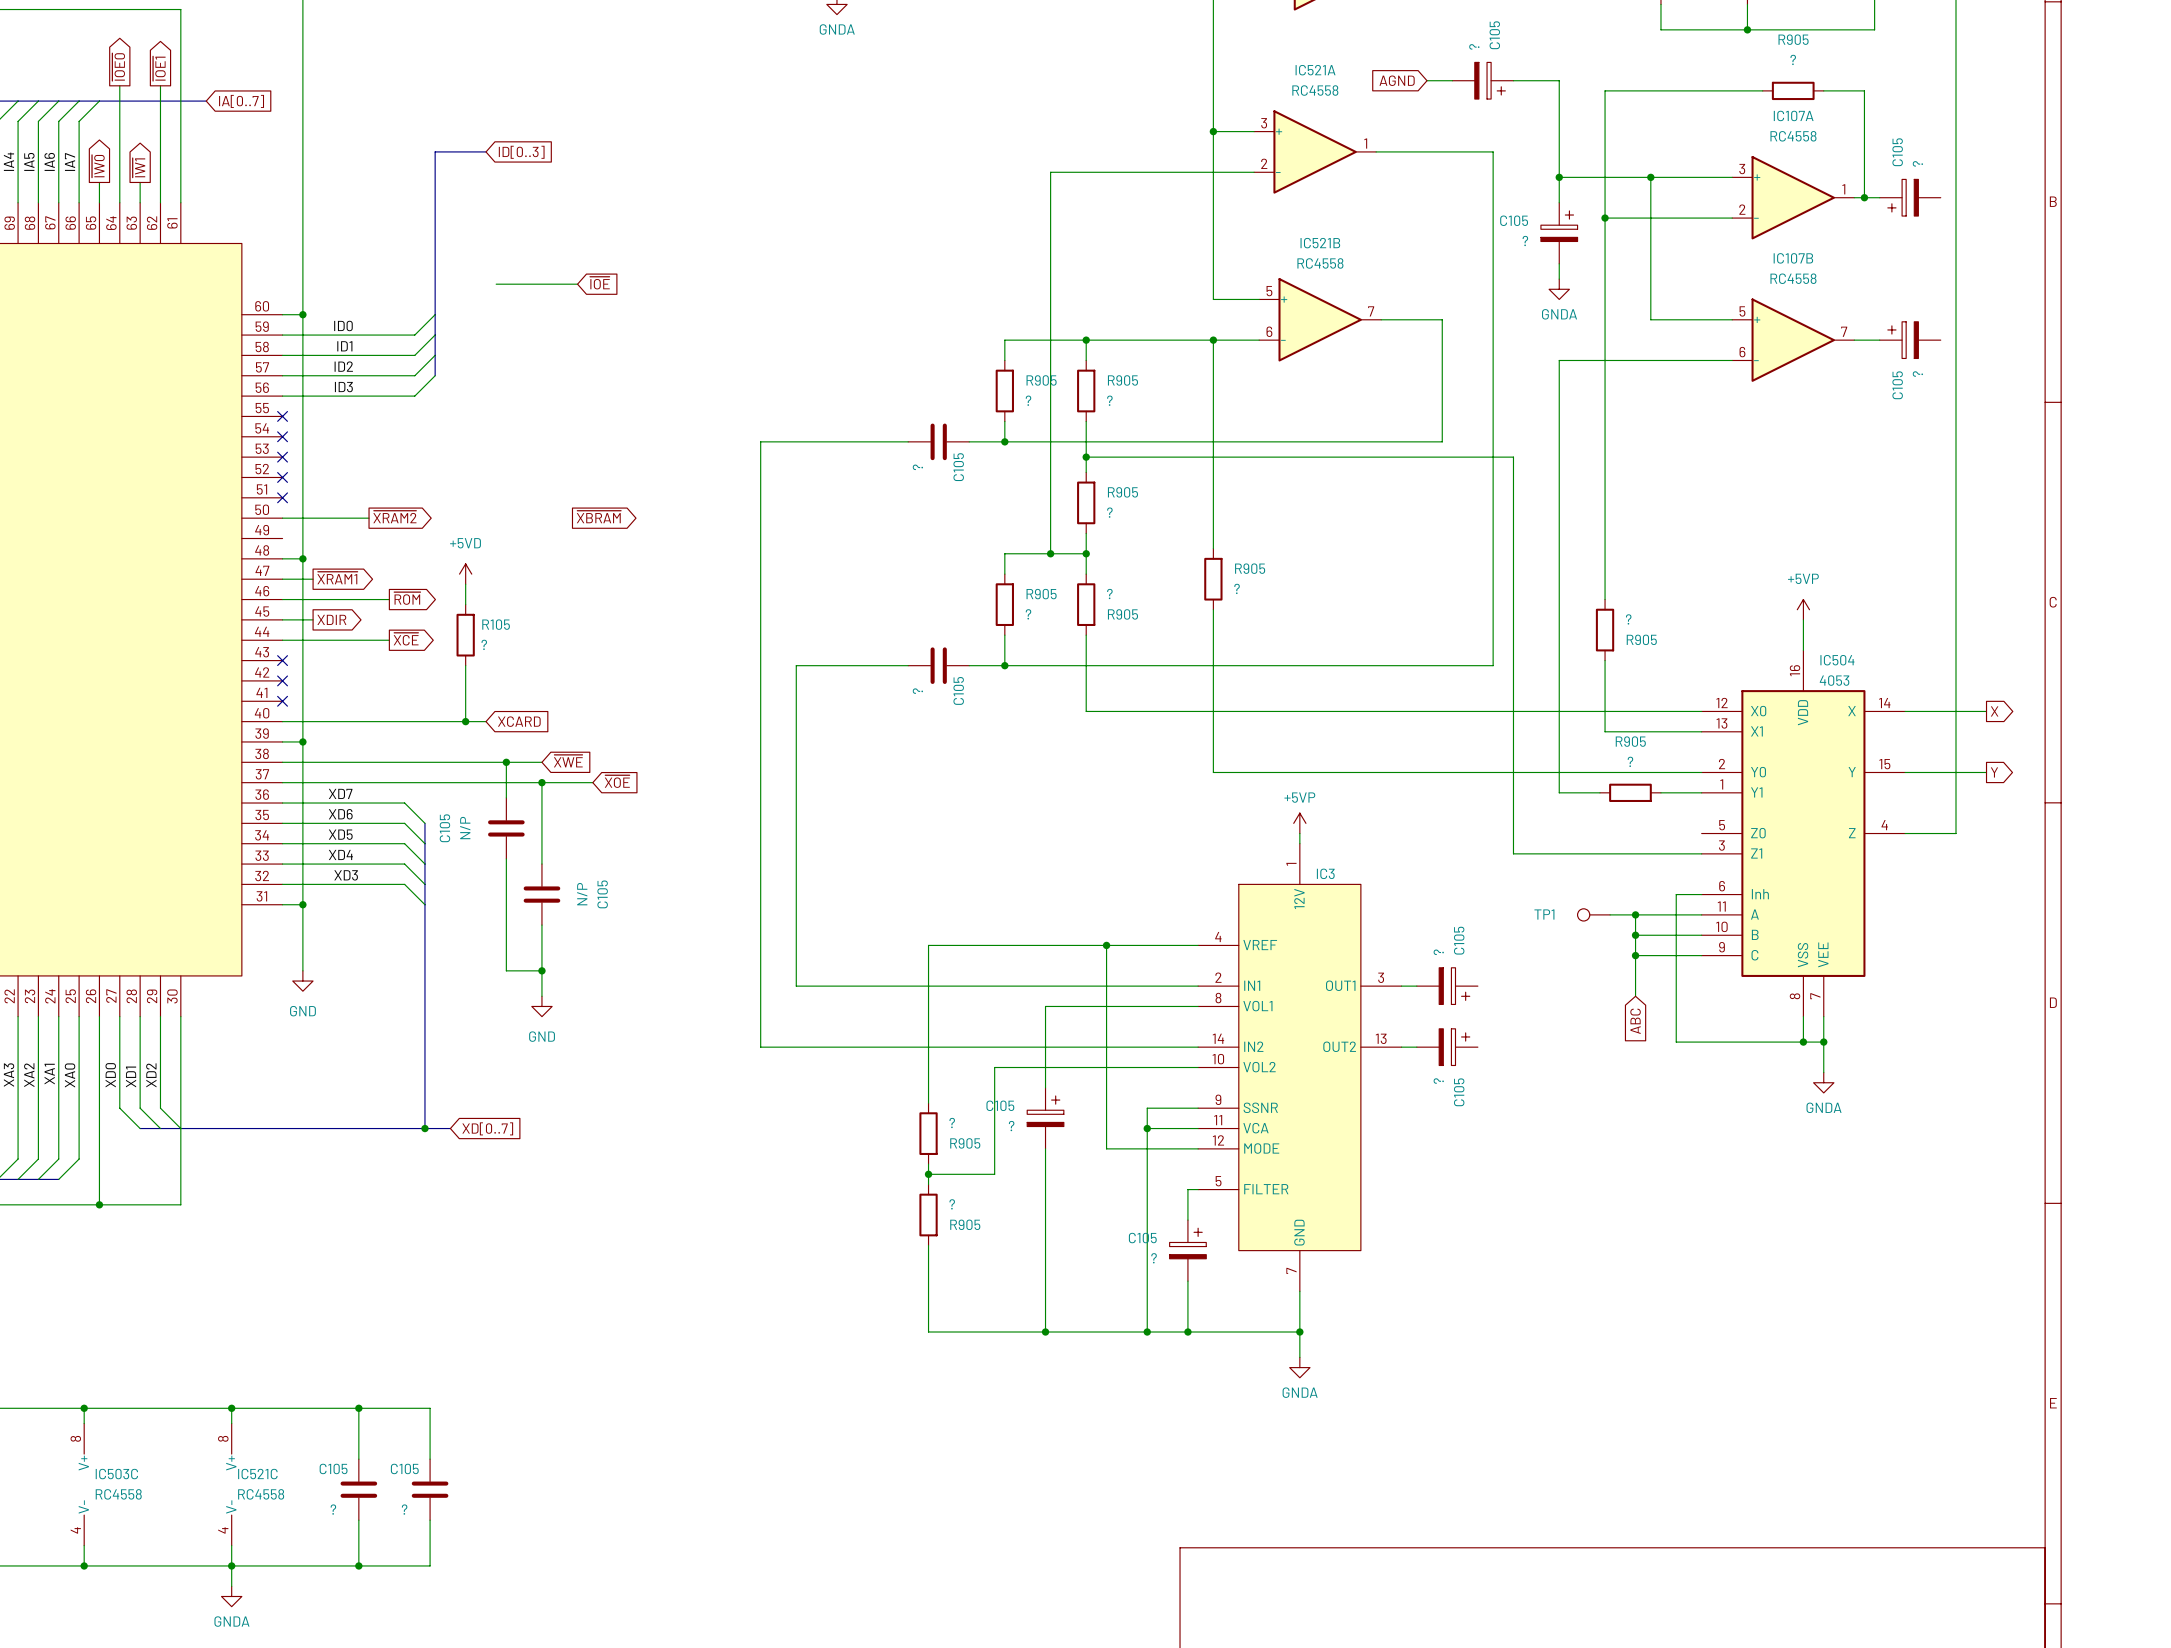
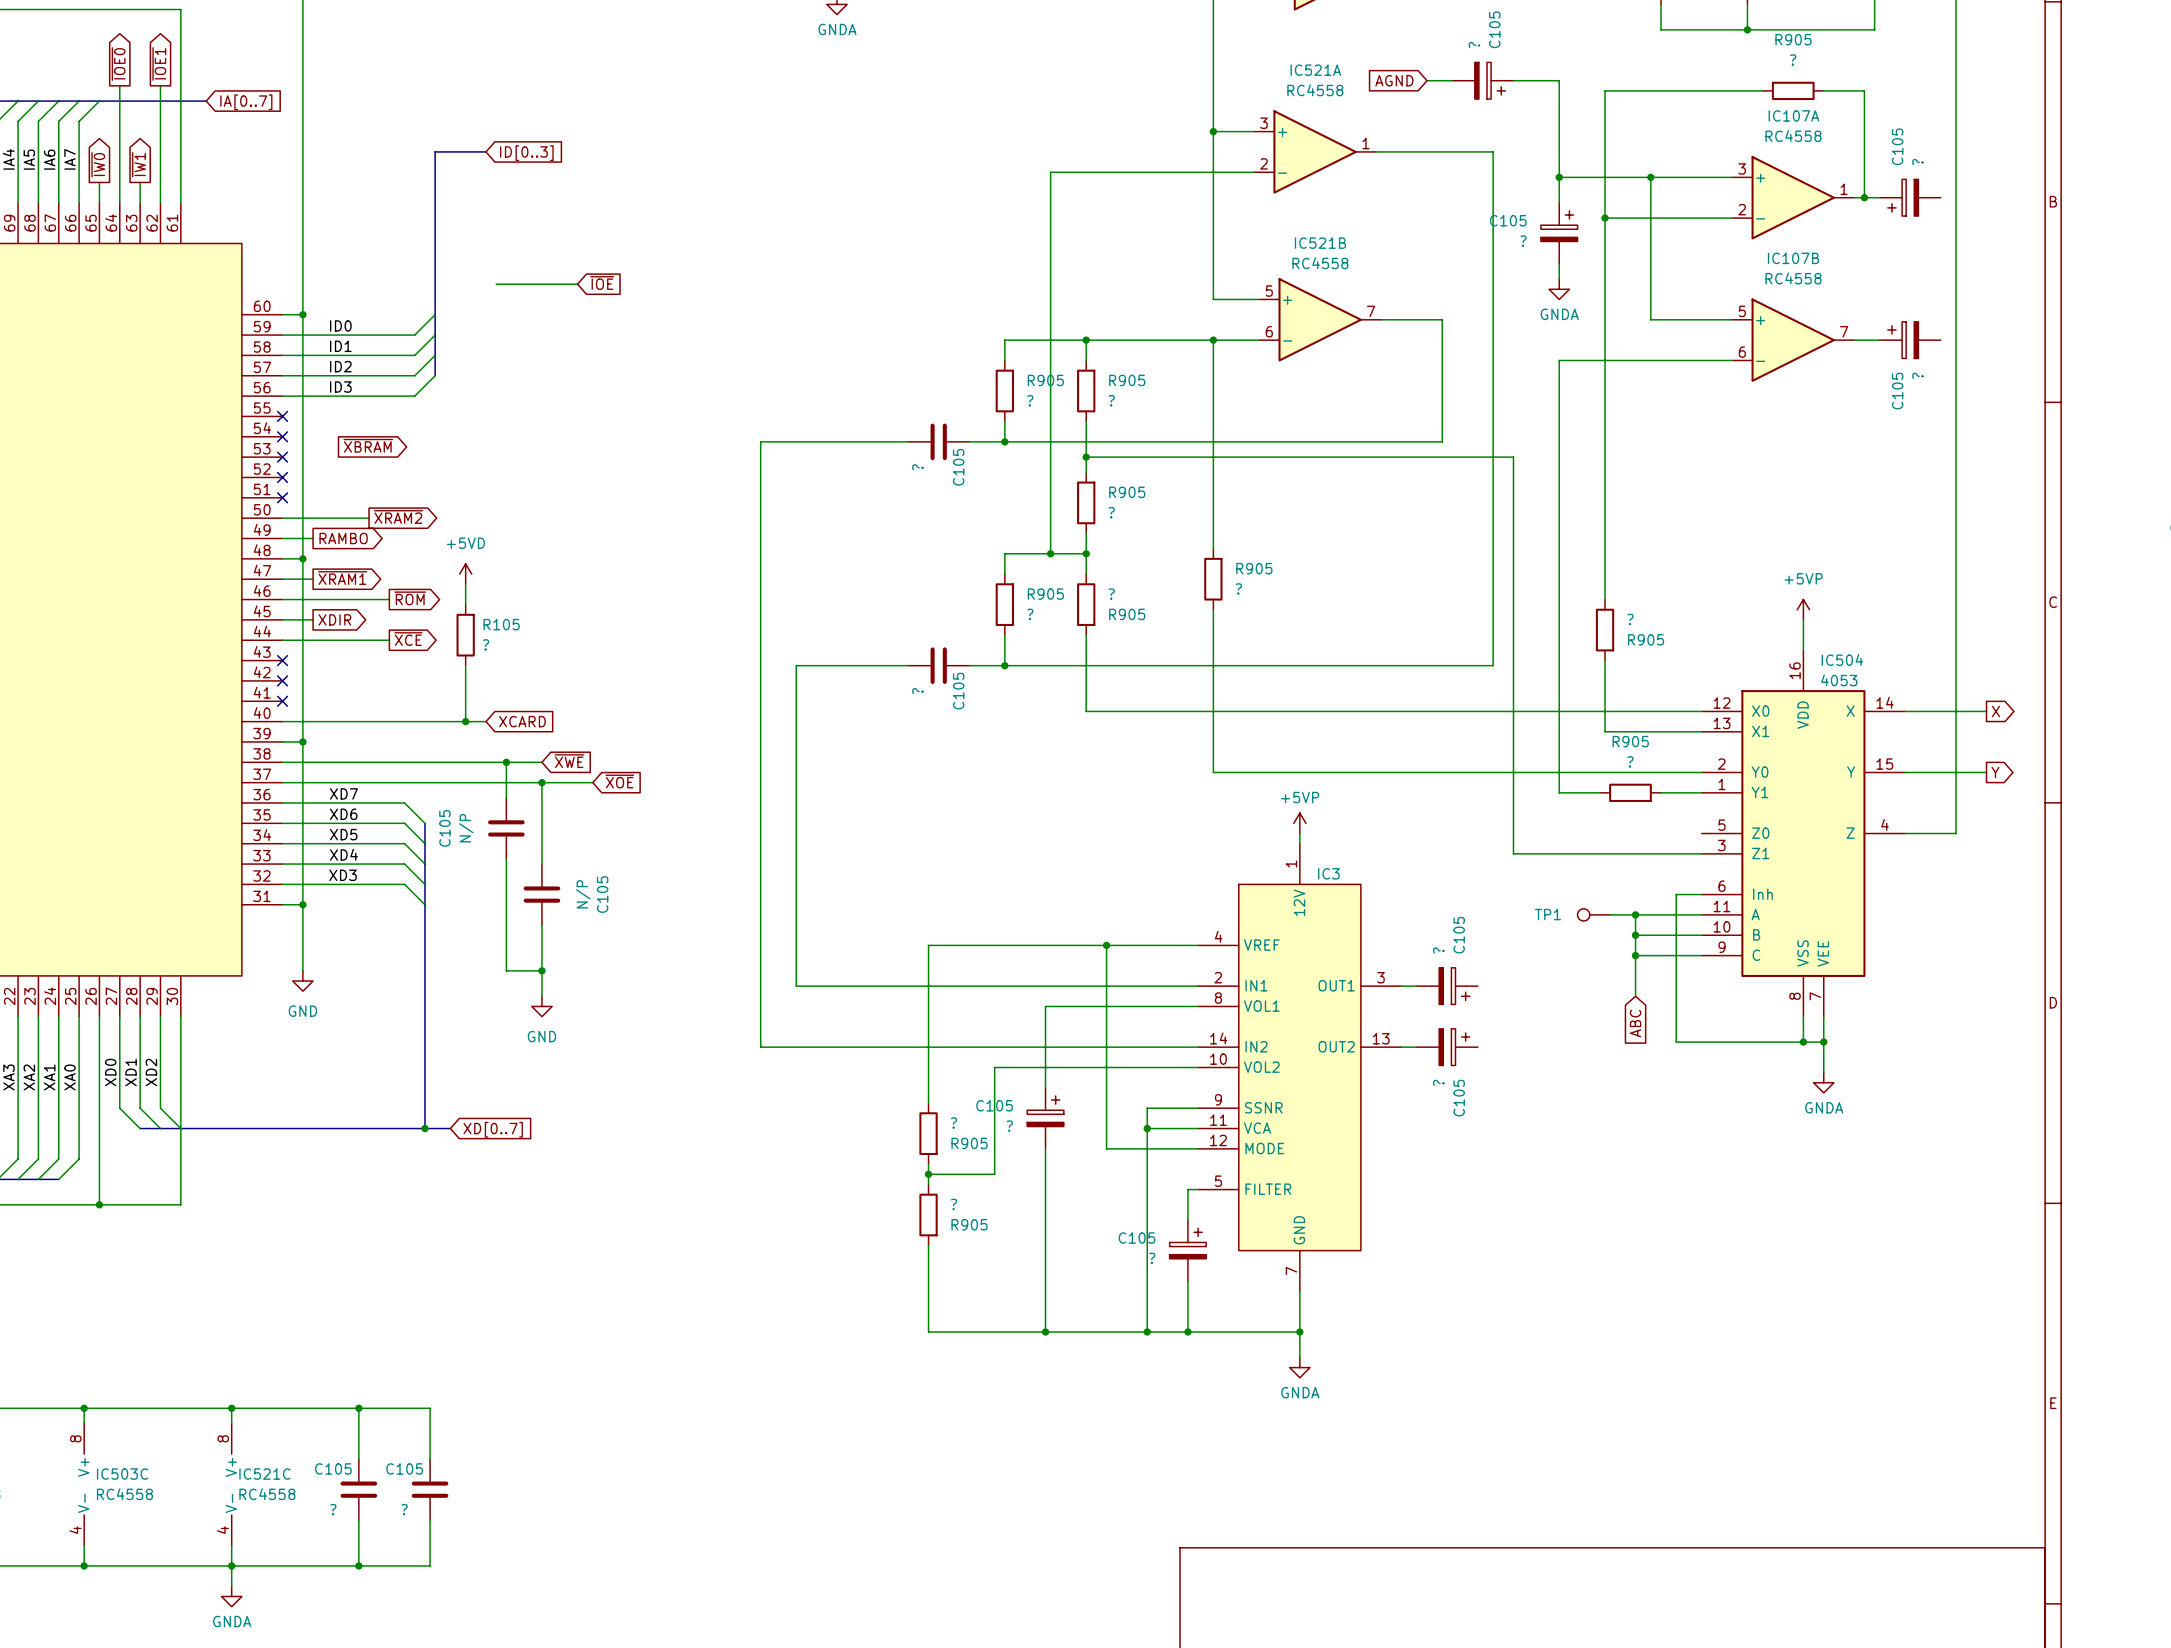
global label: none -> ~{XBRAM} (368, 445)
global label: ~{XBRAM} (598, 516) -> none
wire: none -> (282, 538) (313, 538)
global label: none -> RAMBO (343, 538)

